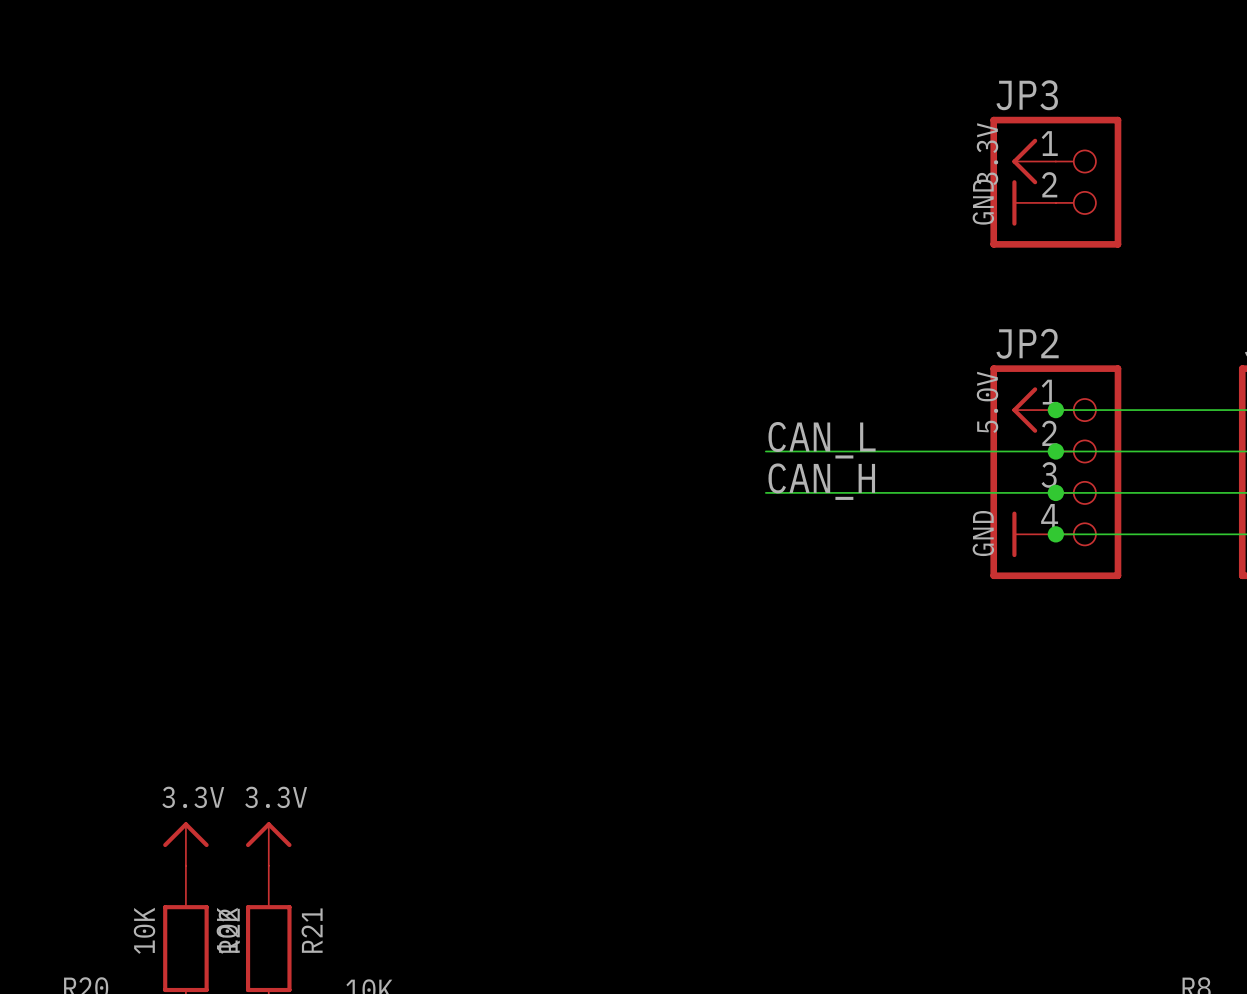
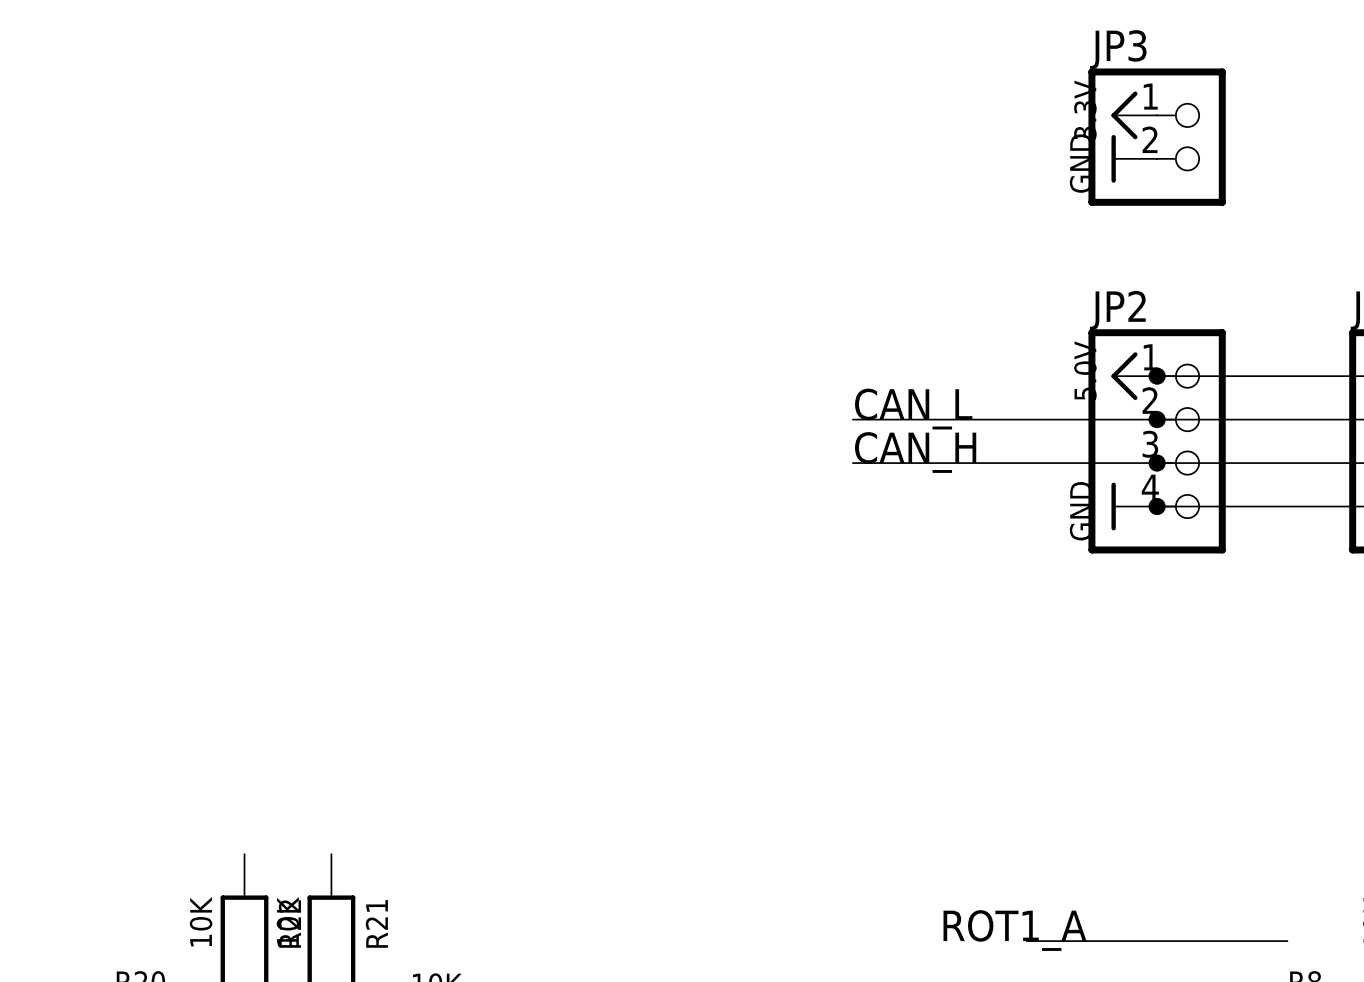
power symbol: 3.3V (185, 843) -> none
power symbol: 3.3V (268, 843) -> none
label: none -> ROT1_A (1014, 930)
wire: none -> (1026, 941) (1287, 941)

